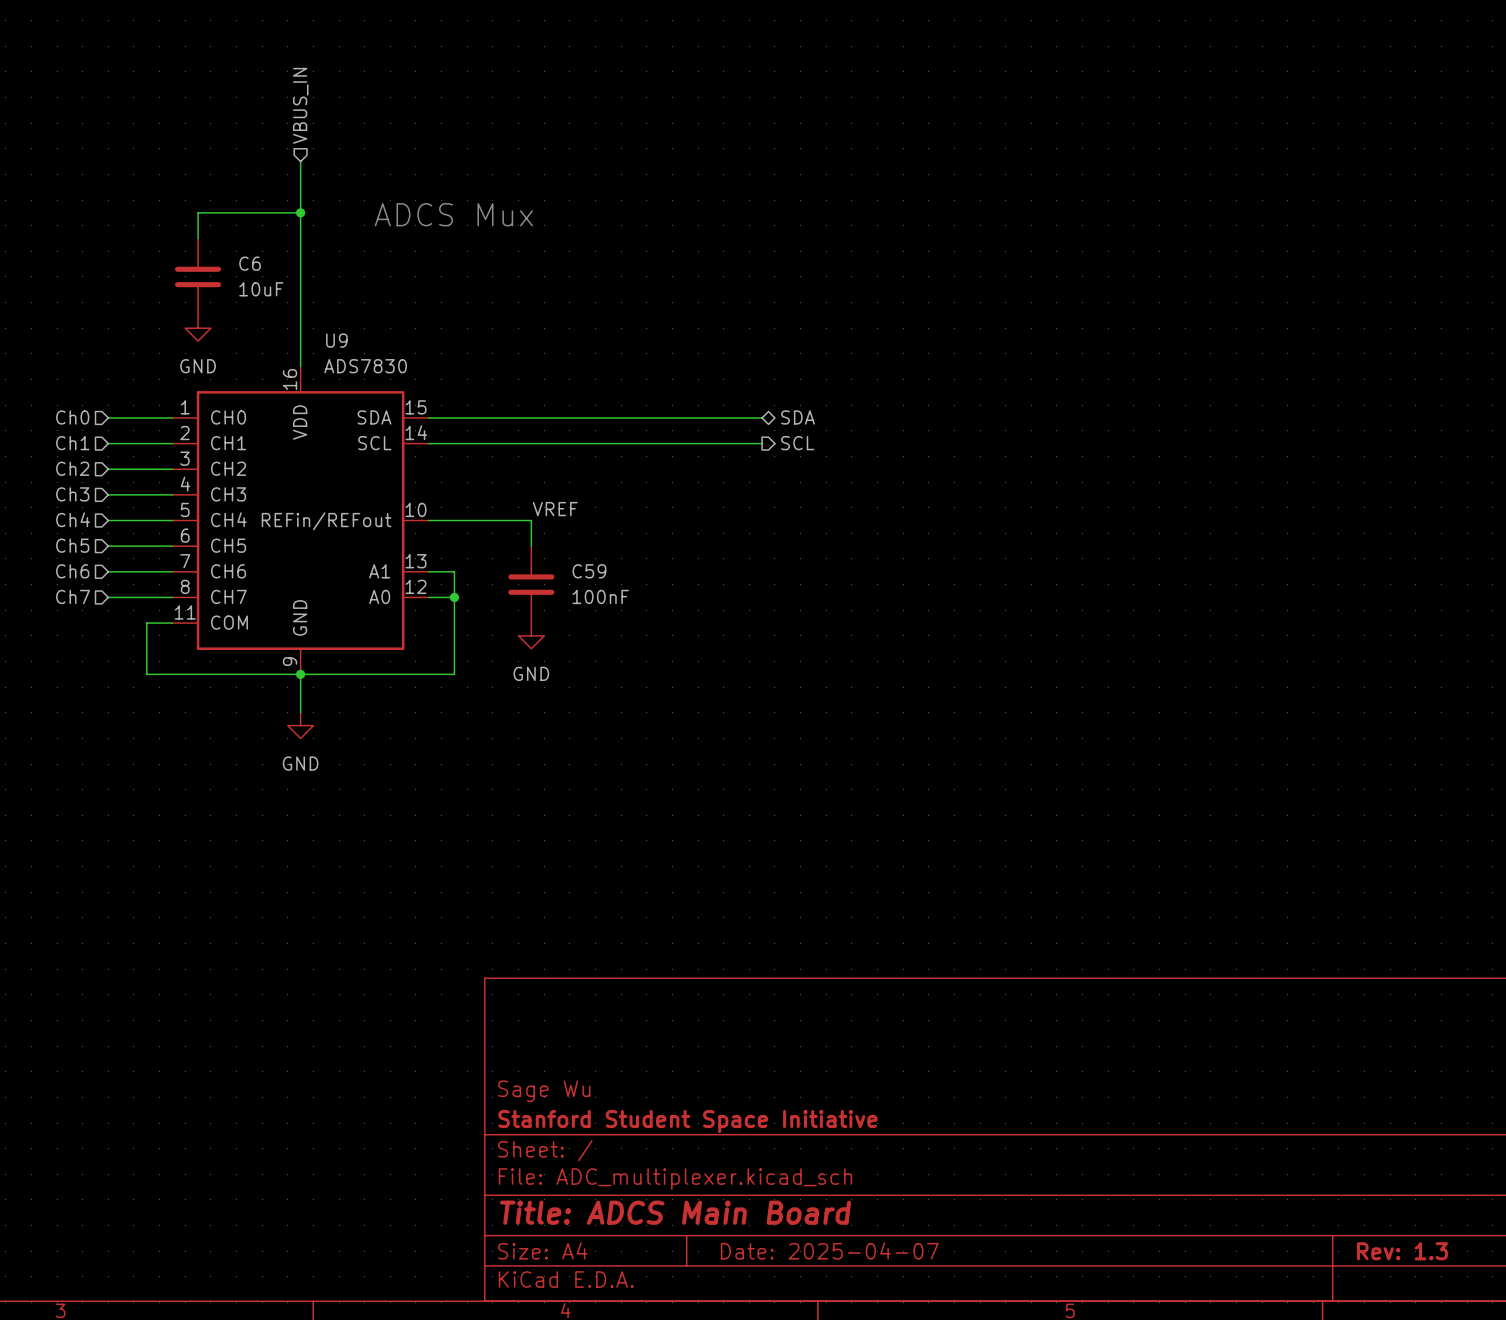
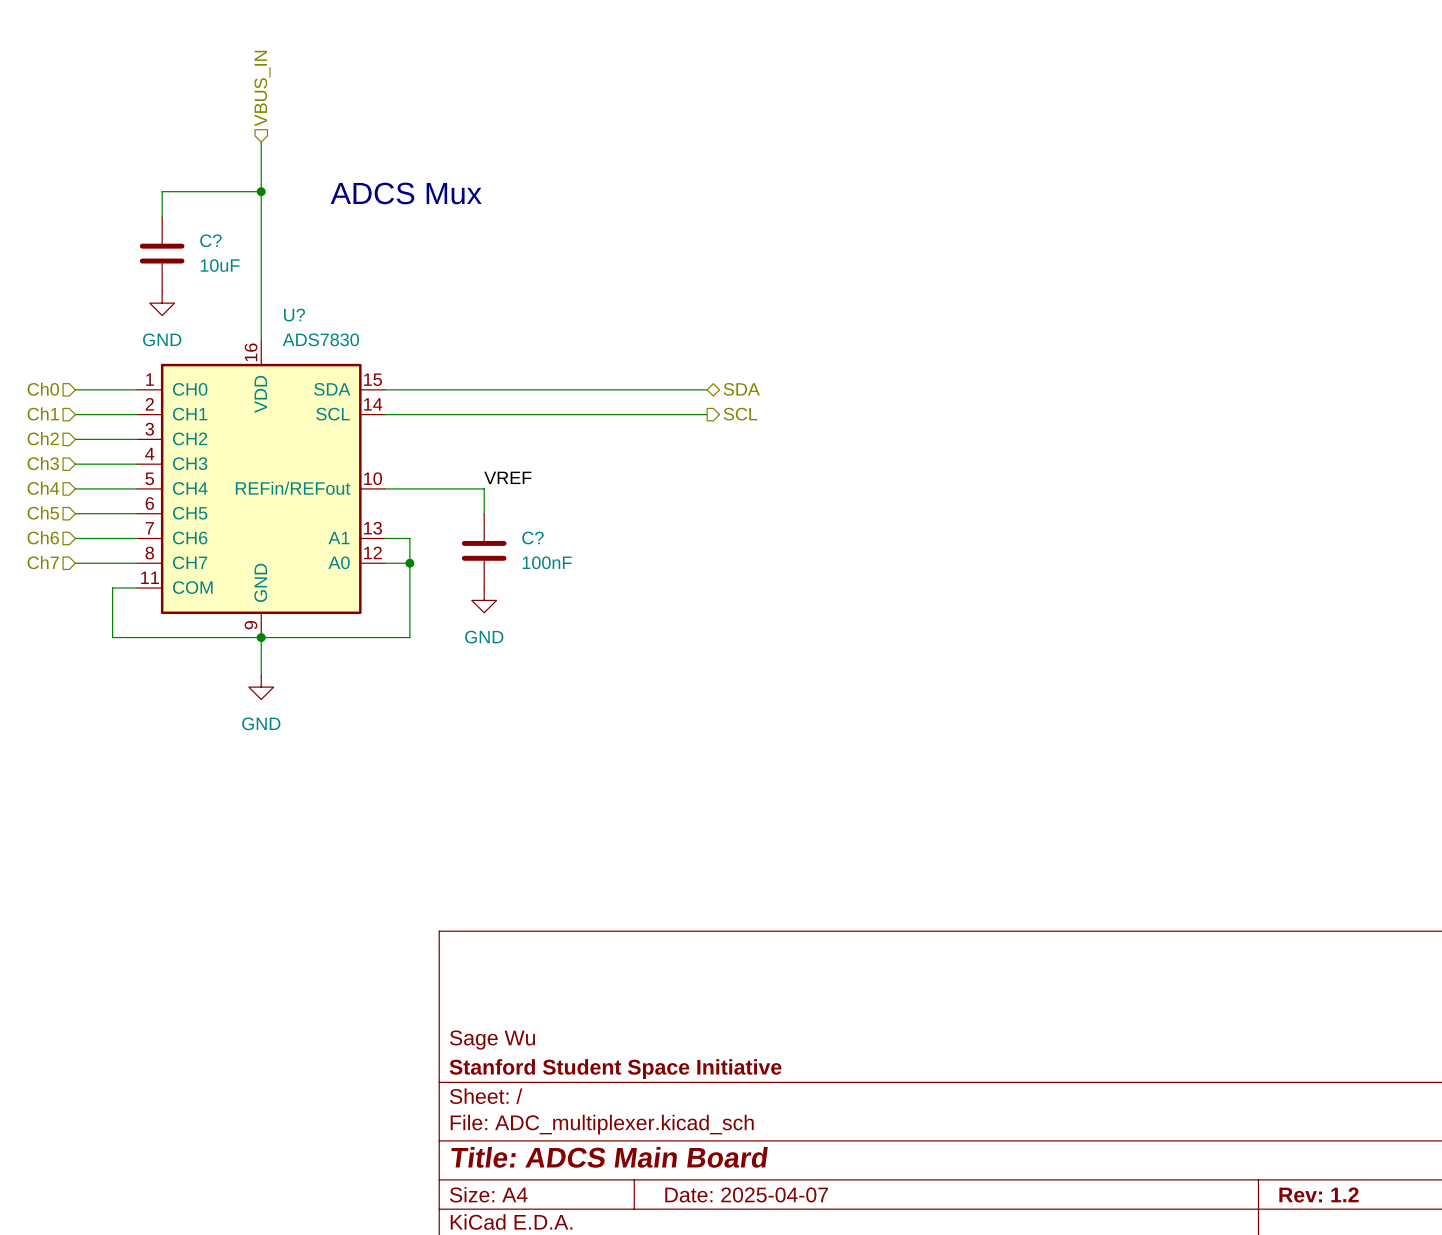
C6 name: C6 (250, 263) -> C? (210, 240)
U9 name: U9 (336, 340) -> U? (294, 315)
C59 name: C59 (589, 571) -> C? (532, 538)
title block: Rev: 1.3 (1402, 1251) -> Rev: 1.2 (1319, 1194)

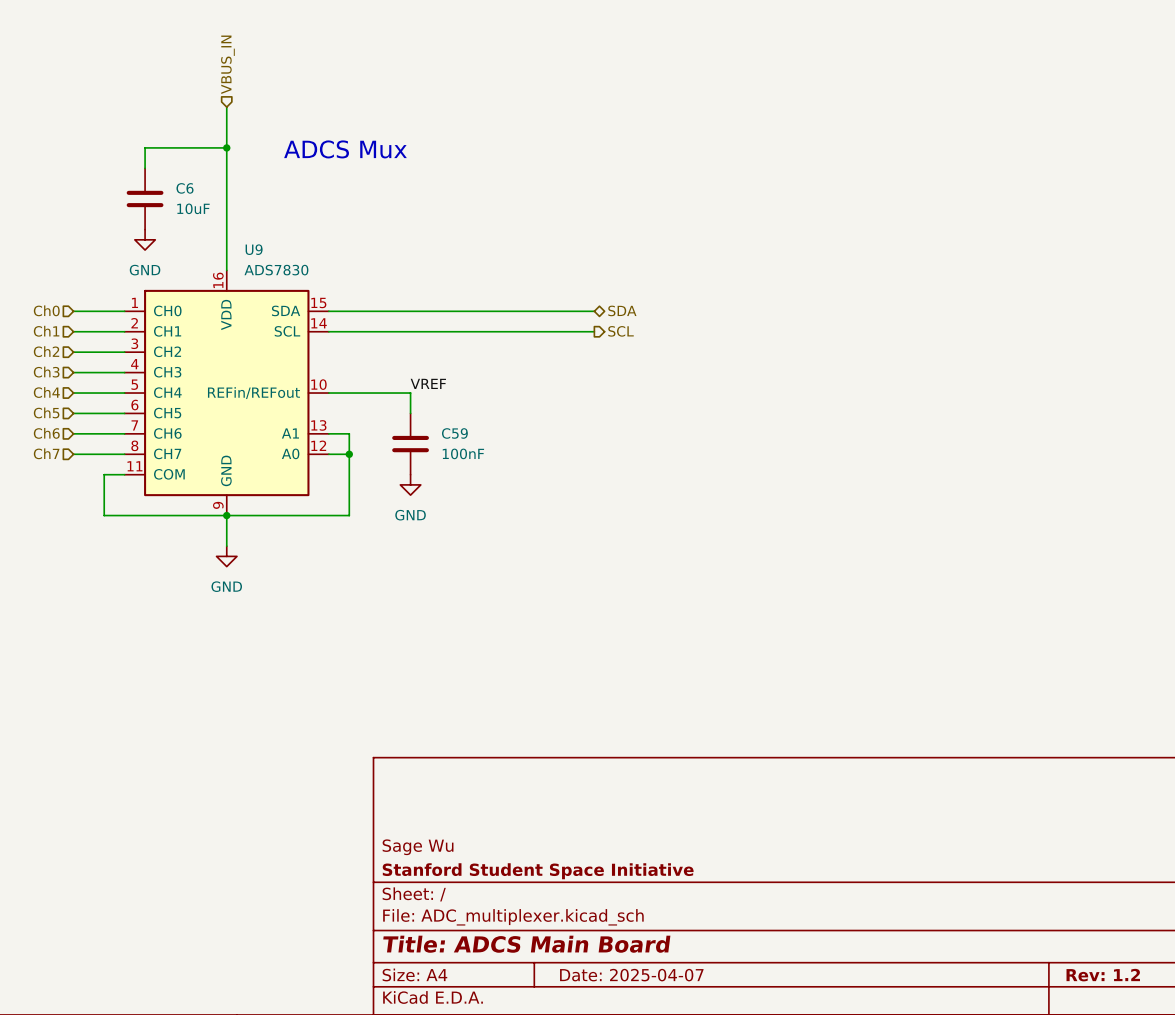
C? name: C? (210, 240) -> C6 (185, 188)
U? name: U? (294, 315) -> U9 (254, 249)
C? name: C? (532, 538) -> C59 (454, 433)

